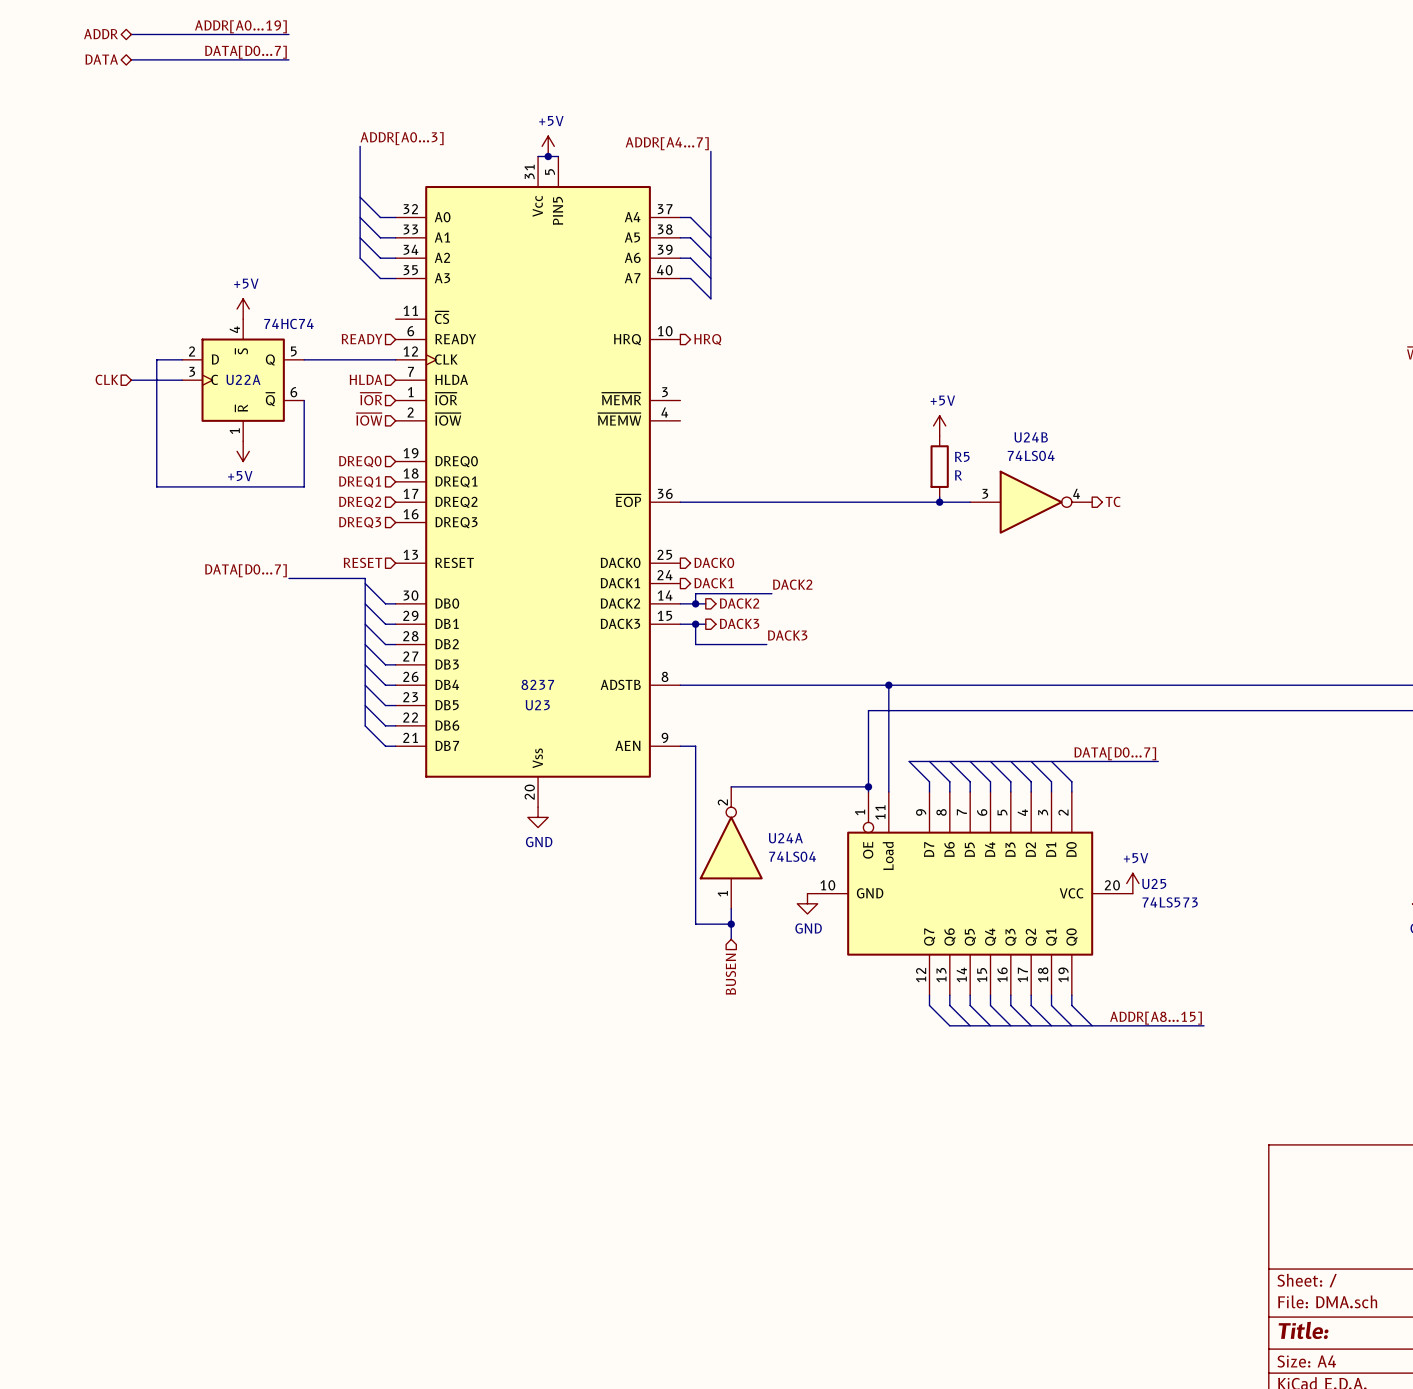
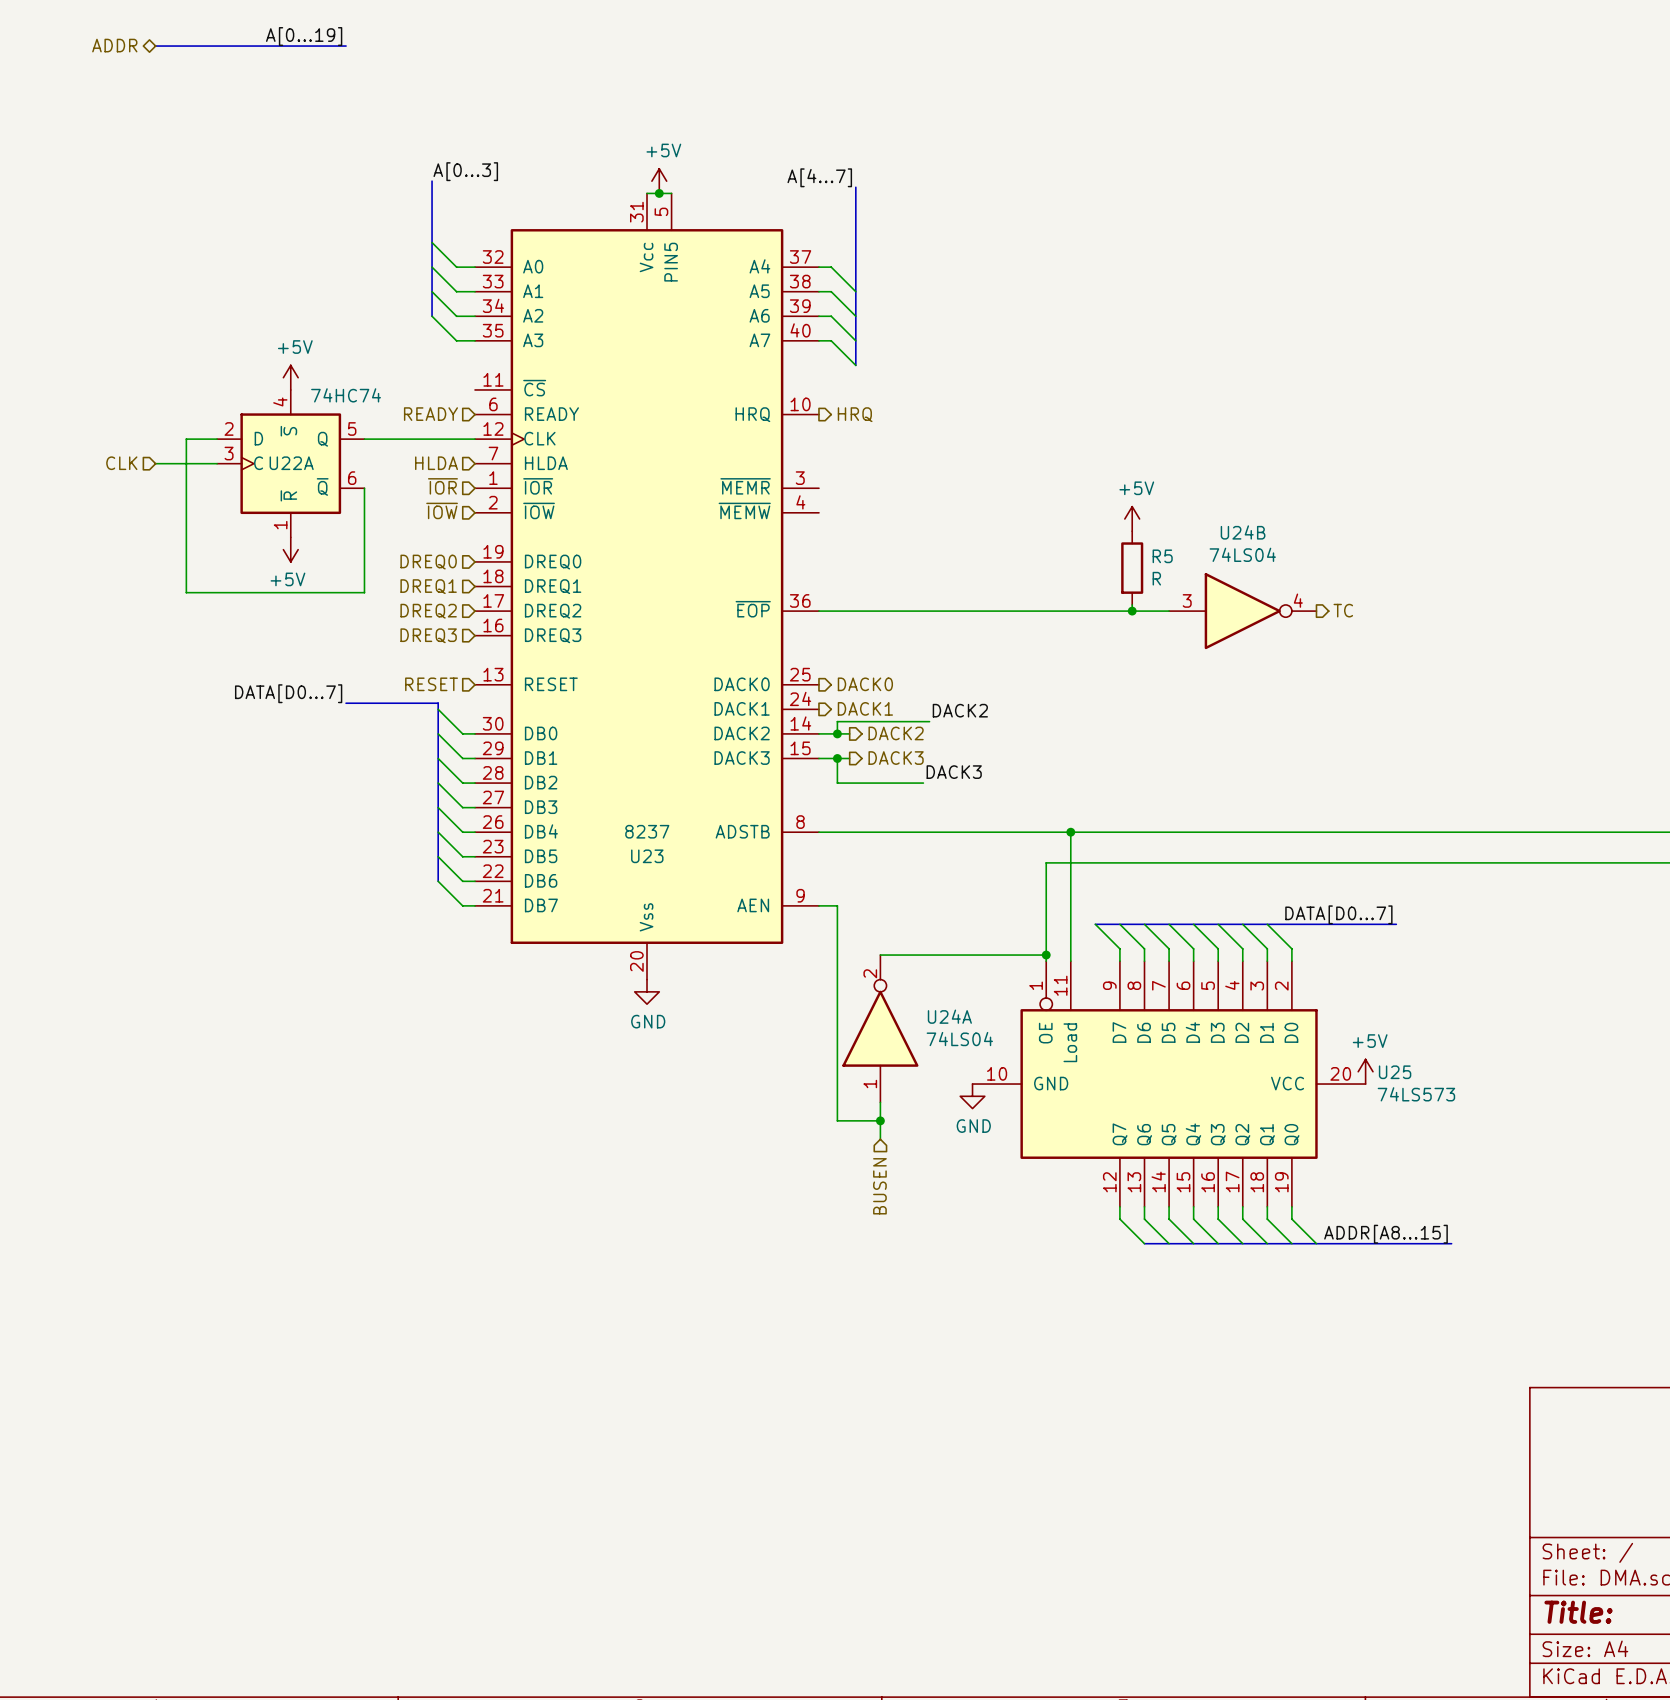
label: ADDR[A0...19] (240, 26) -> A[0...19] (304, 36)
label: DATA[D0...7] (246, 52) -> none
hierarchical label: DATA (101, 59) -> none
bus: (131, 59) (288, 59) -> none
label: ADDR[A0...3] (402, 138) -> A[0...3] (465, 171)
label: ADDR[A4...7] (667, 143) -> A[4...7] (819, 177)

